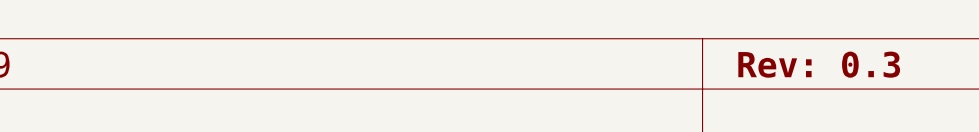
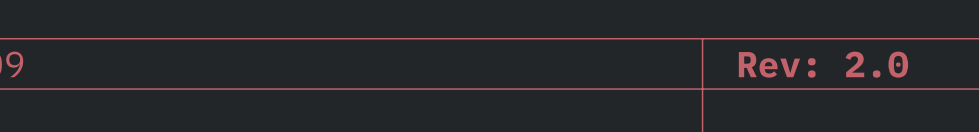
title block: Rev: 0.3 (819, 64) -> Rev: 2.0 (823, 64)

